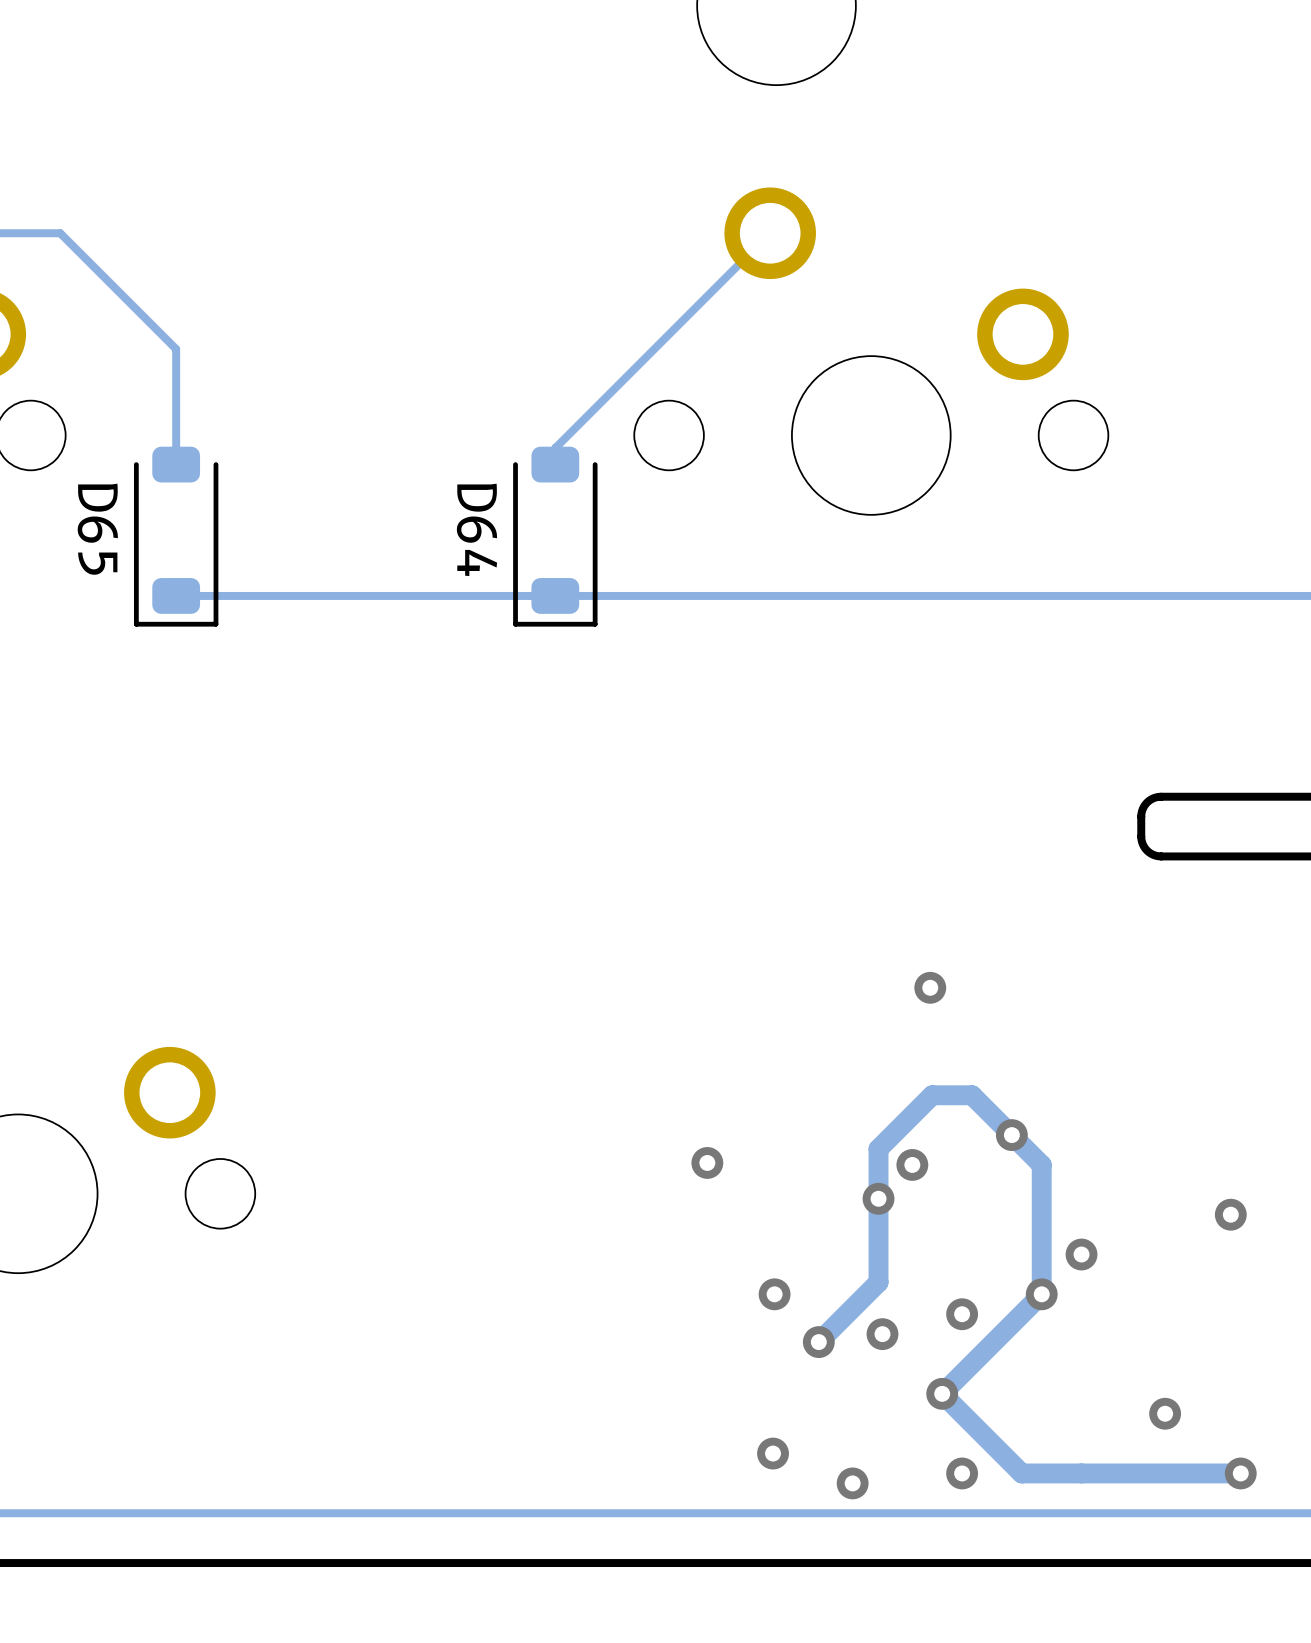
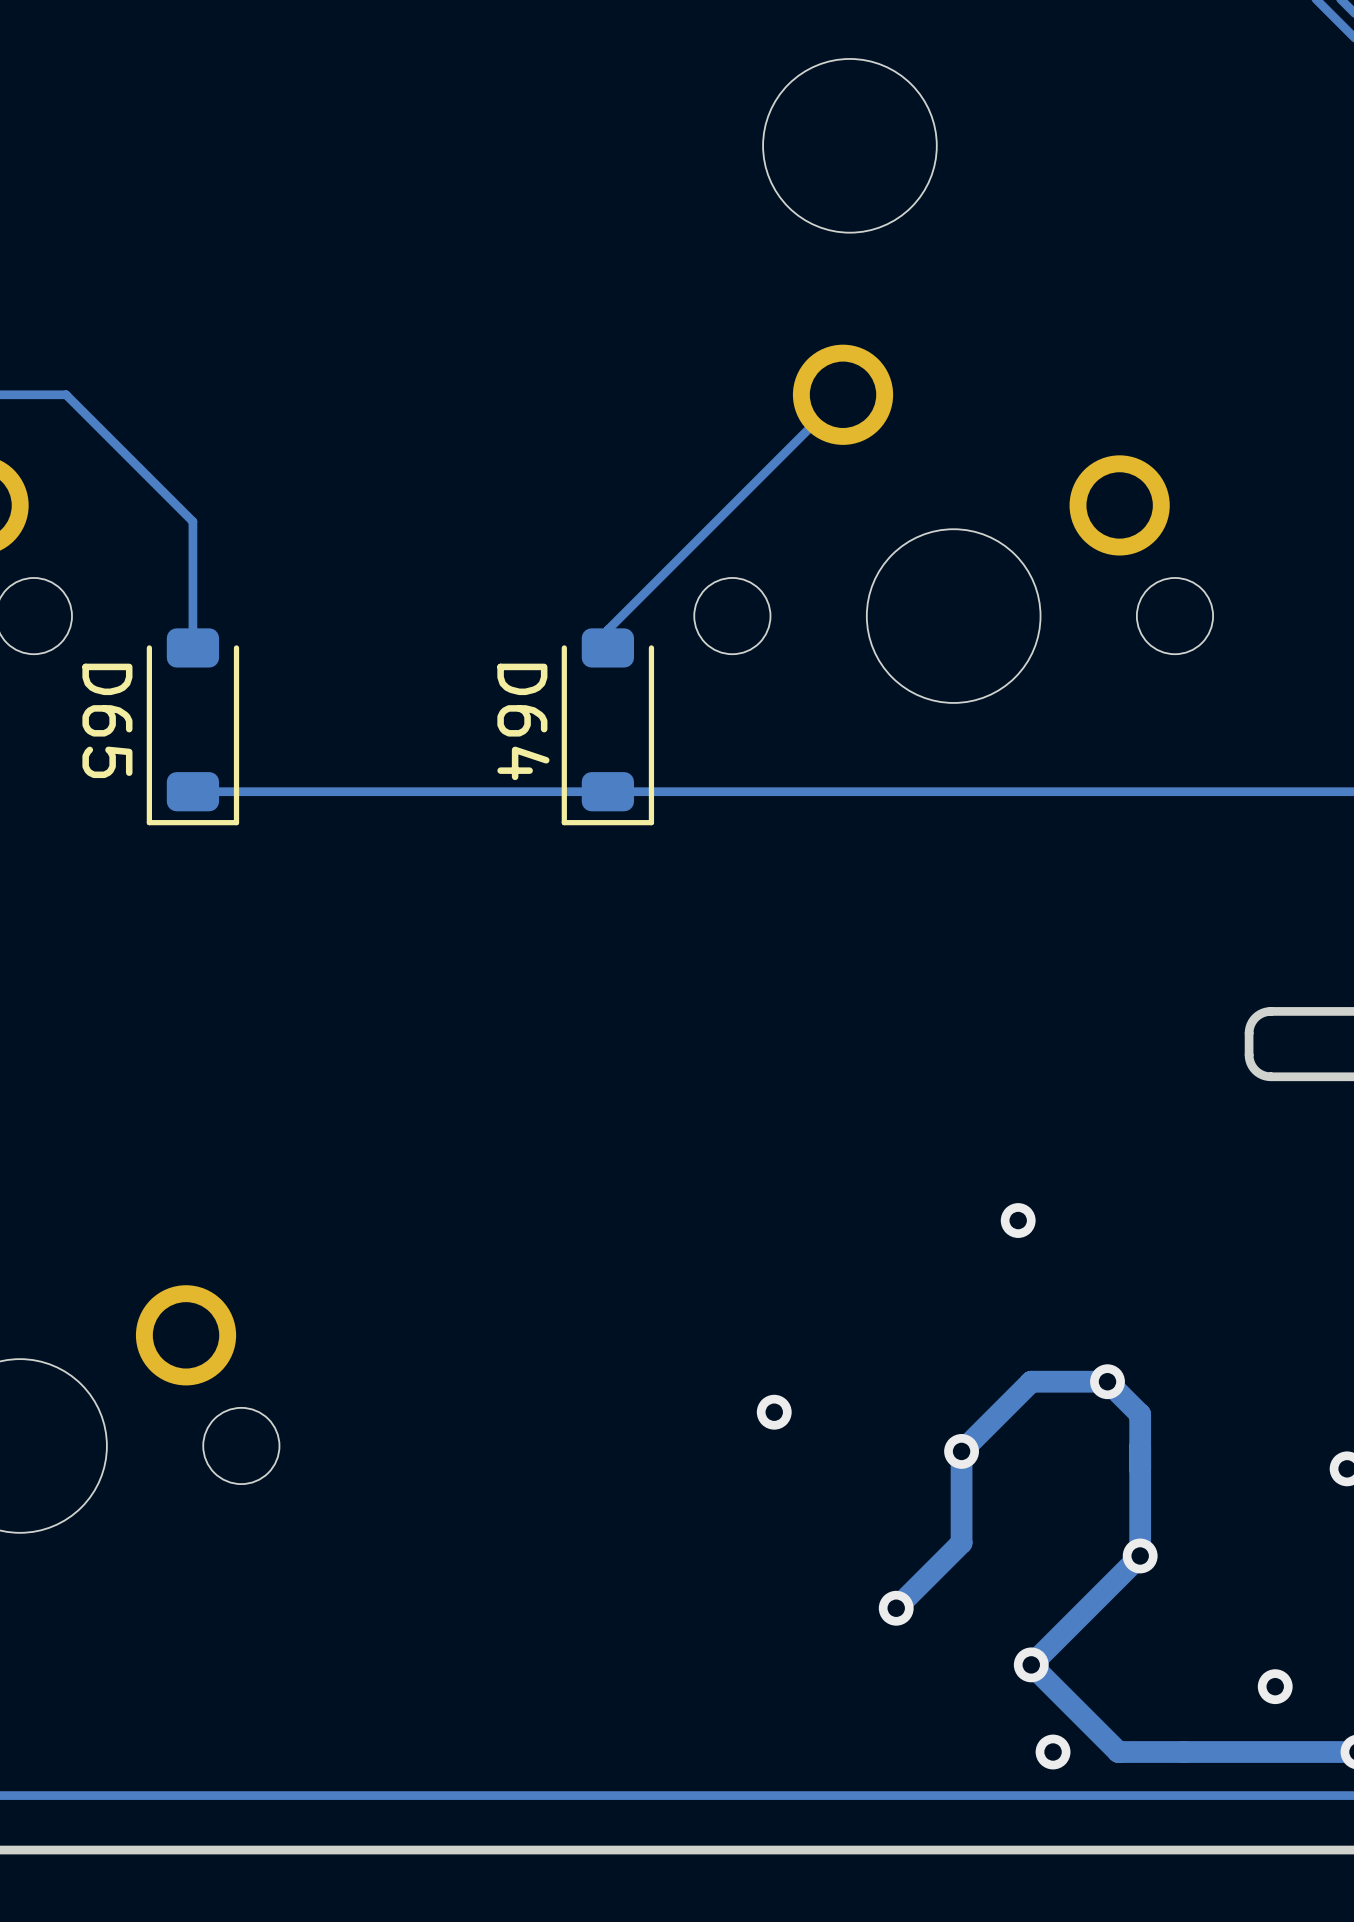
track: (1011, 1135) (972, 1095) (932, 1095) (878, 1149) (878, 1198) -> (1107, 1381) (1031, 1381) (961, 1451)
via: (912, 1164) -> none
via: (1081, 1254) -> none
via: (774, 1294) -> none
via: (962, 1314) -> none
via: (882, 1334) -> none
via: (773, 1453) -> none
via: (852, 1483) -> none

